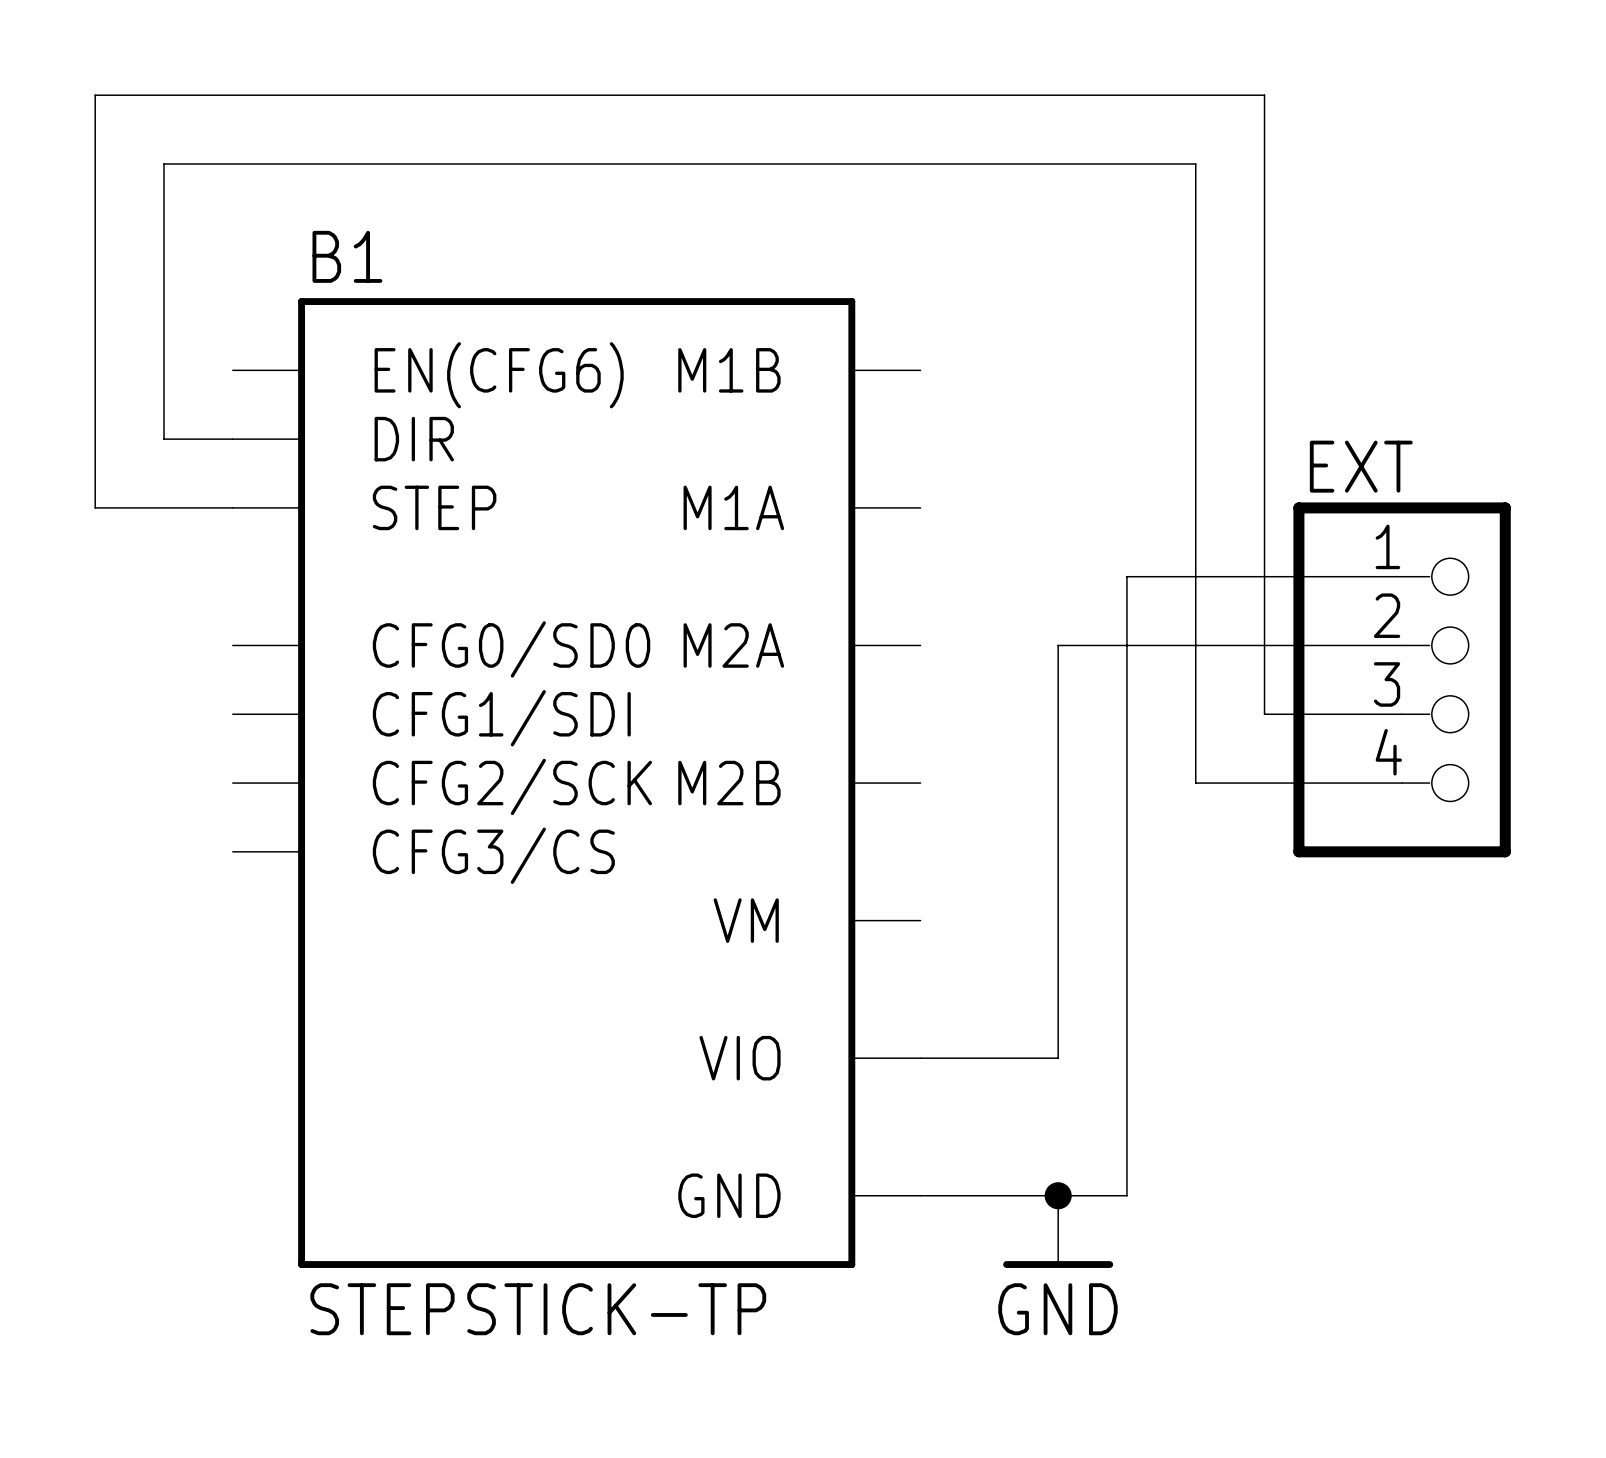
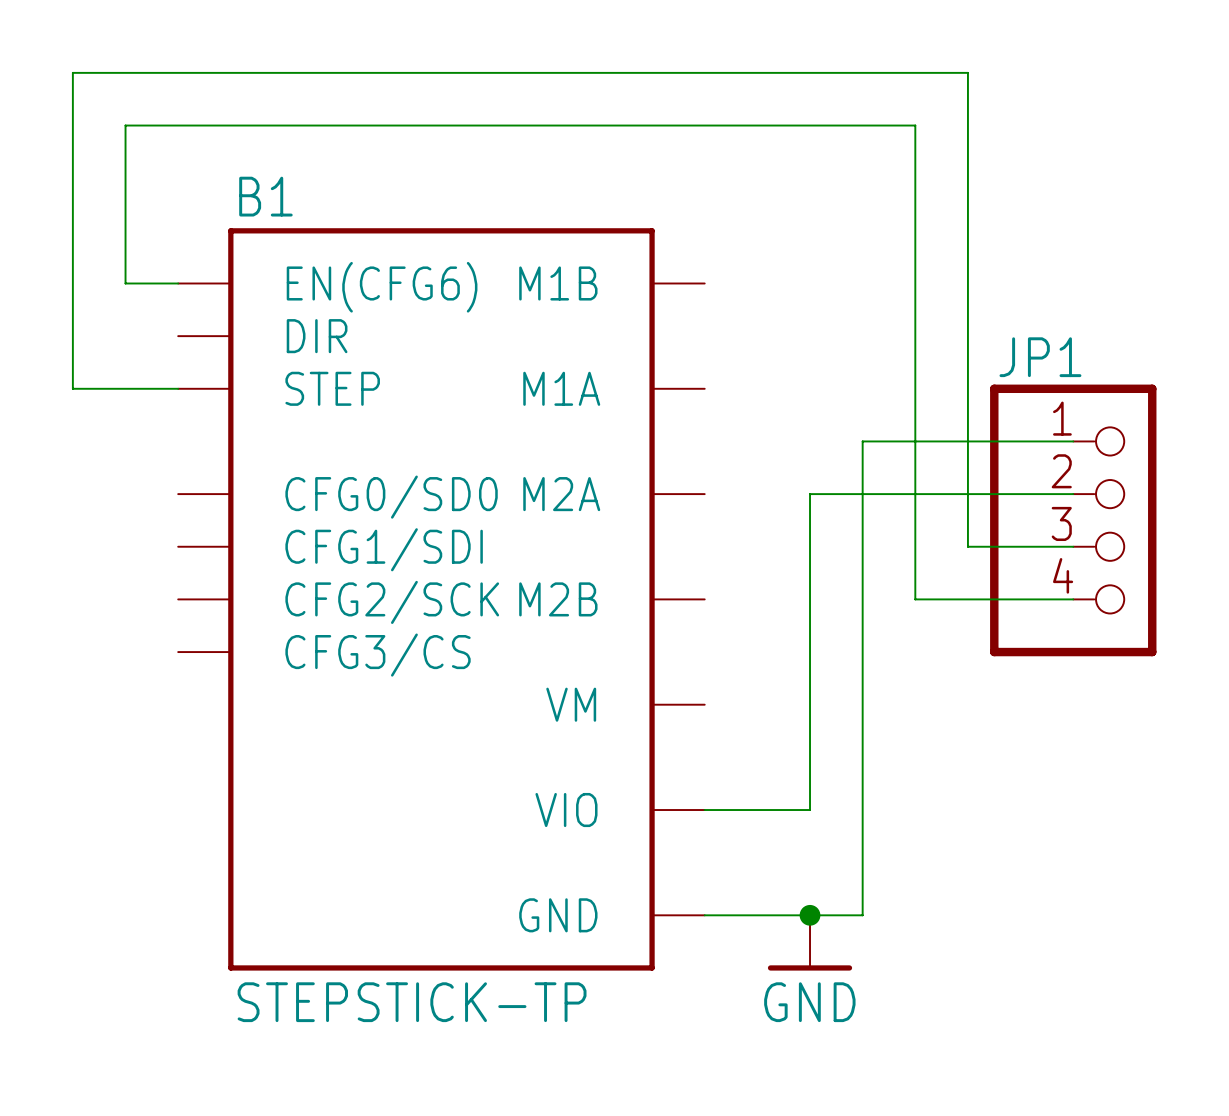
wire: (163, 370) (163, 439) (232, 439) -> (125, 283) (178, 283)
EXT name: EXT (1361, 466) -> JP1 (1040, 357)

